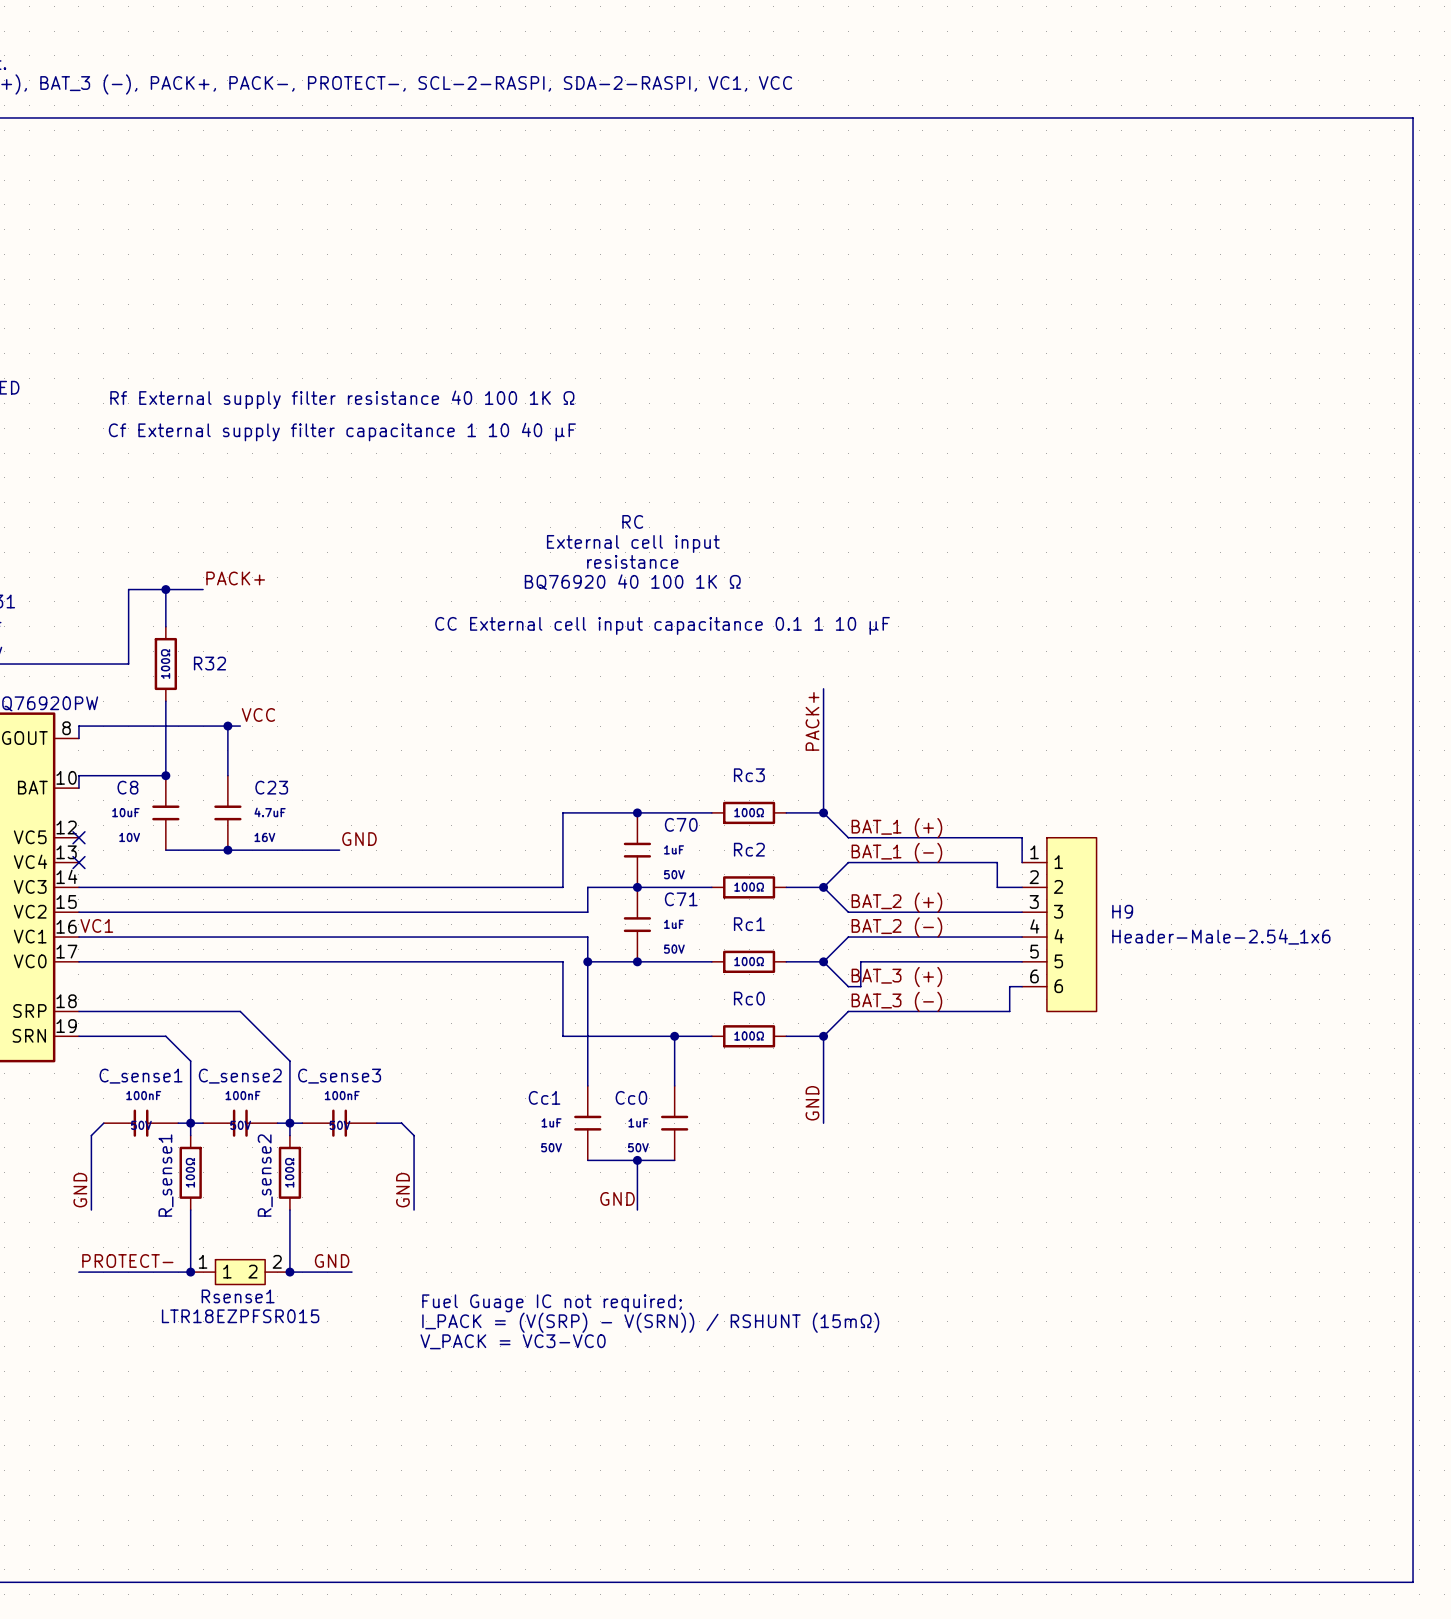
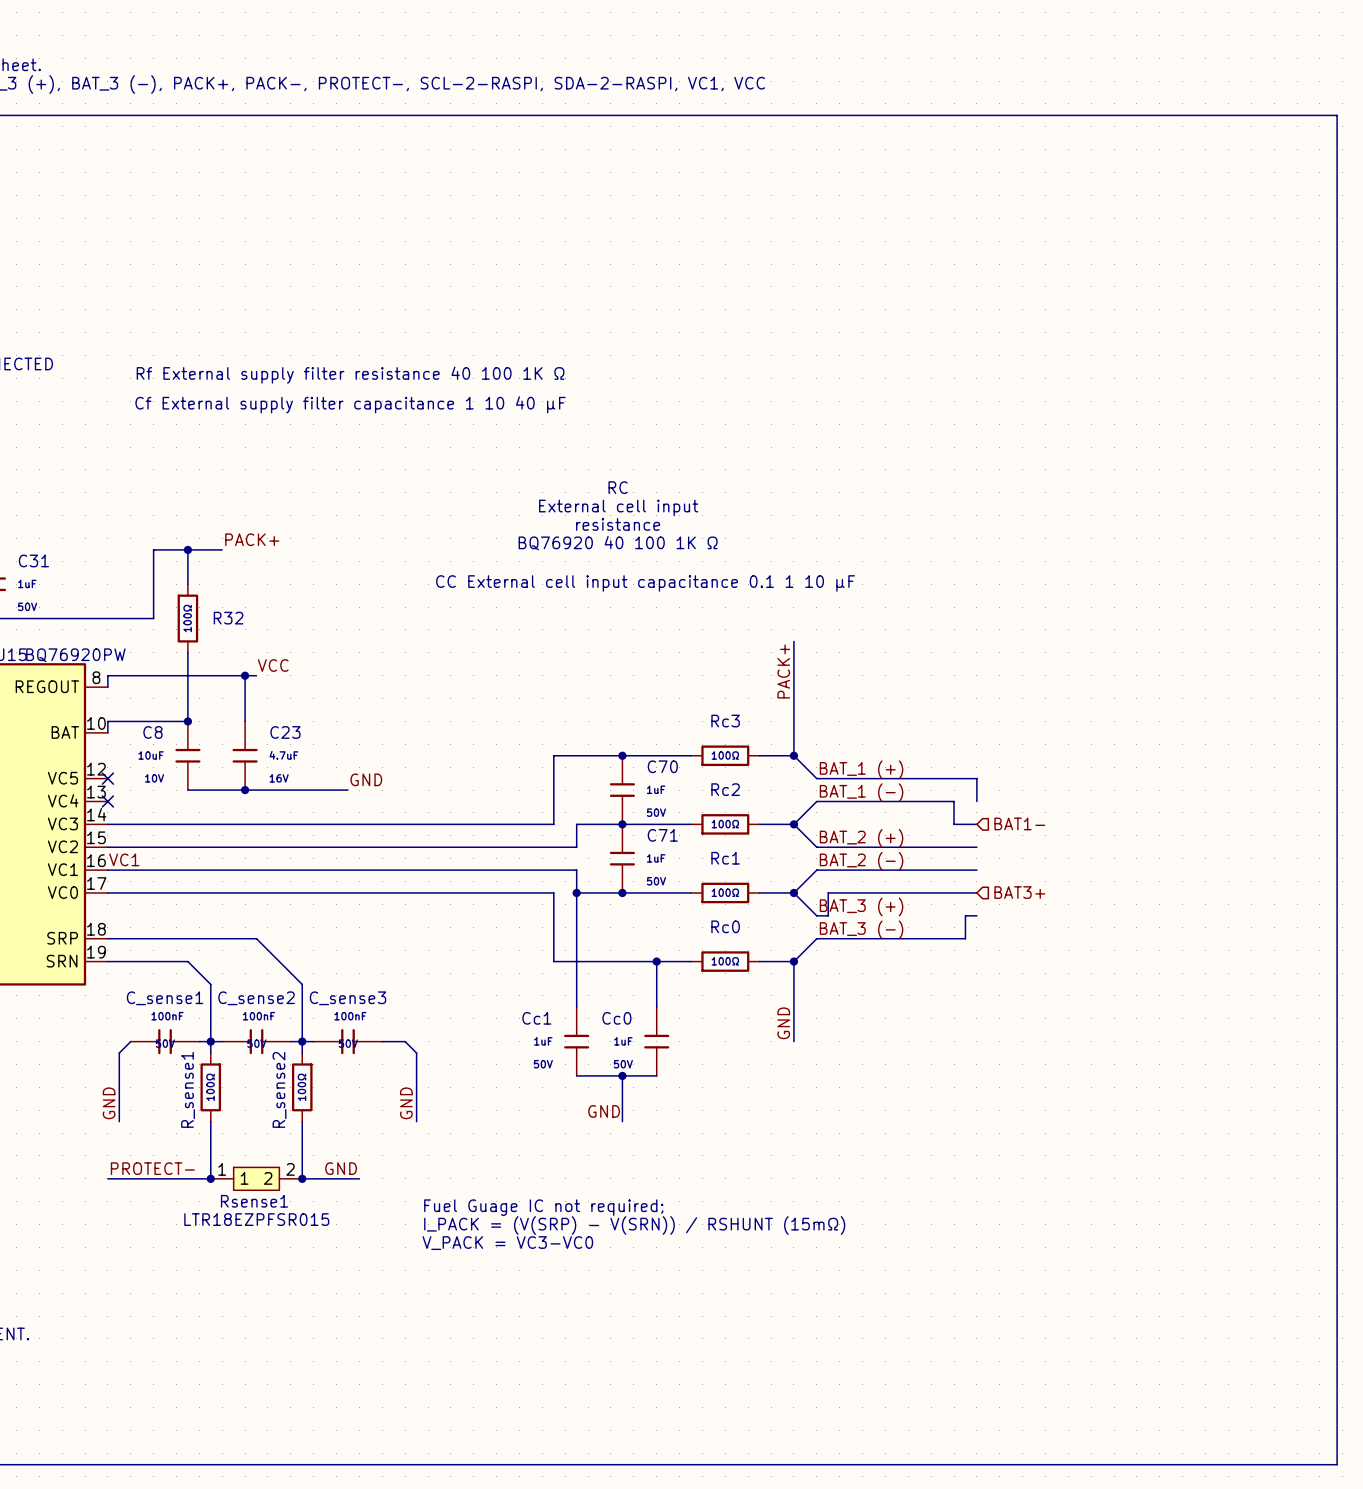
hierarchical label: none -> BAT1- (1019, 823)
H9: Header-Male-2.54_1x6 (1059, 924) -> none
hierarchical label: none -> BAT3+ (1019, 892)

